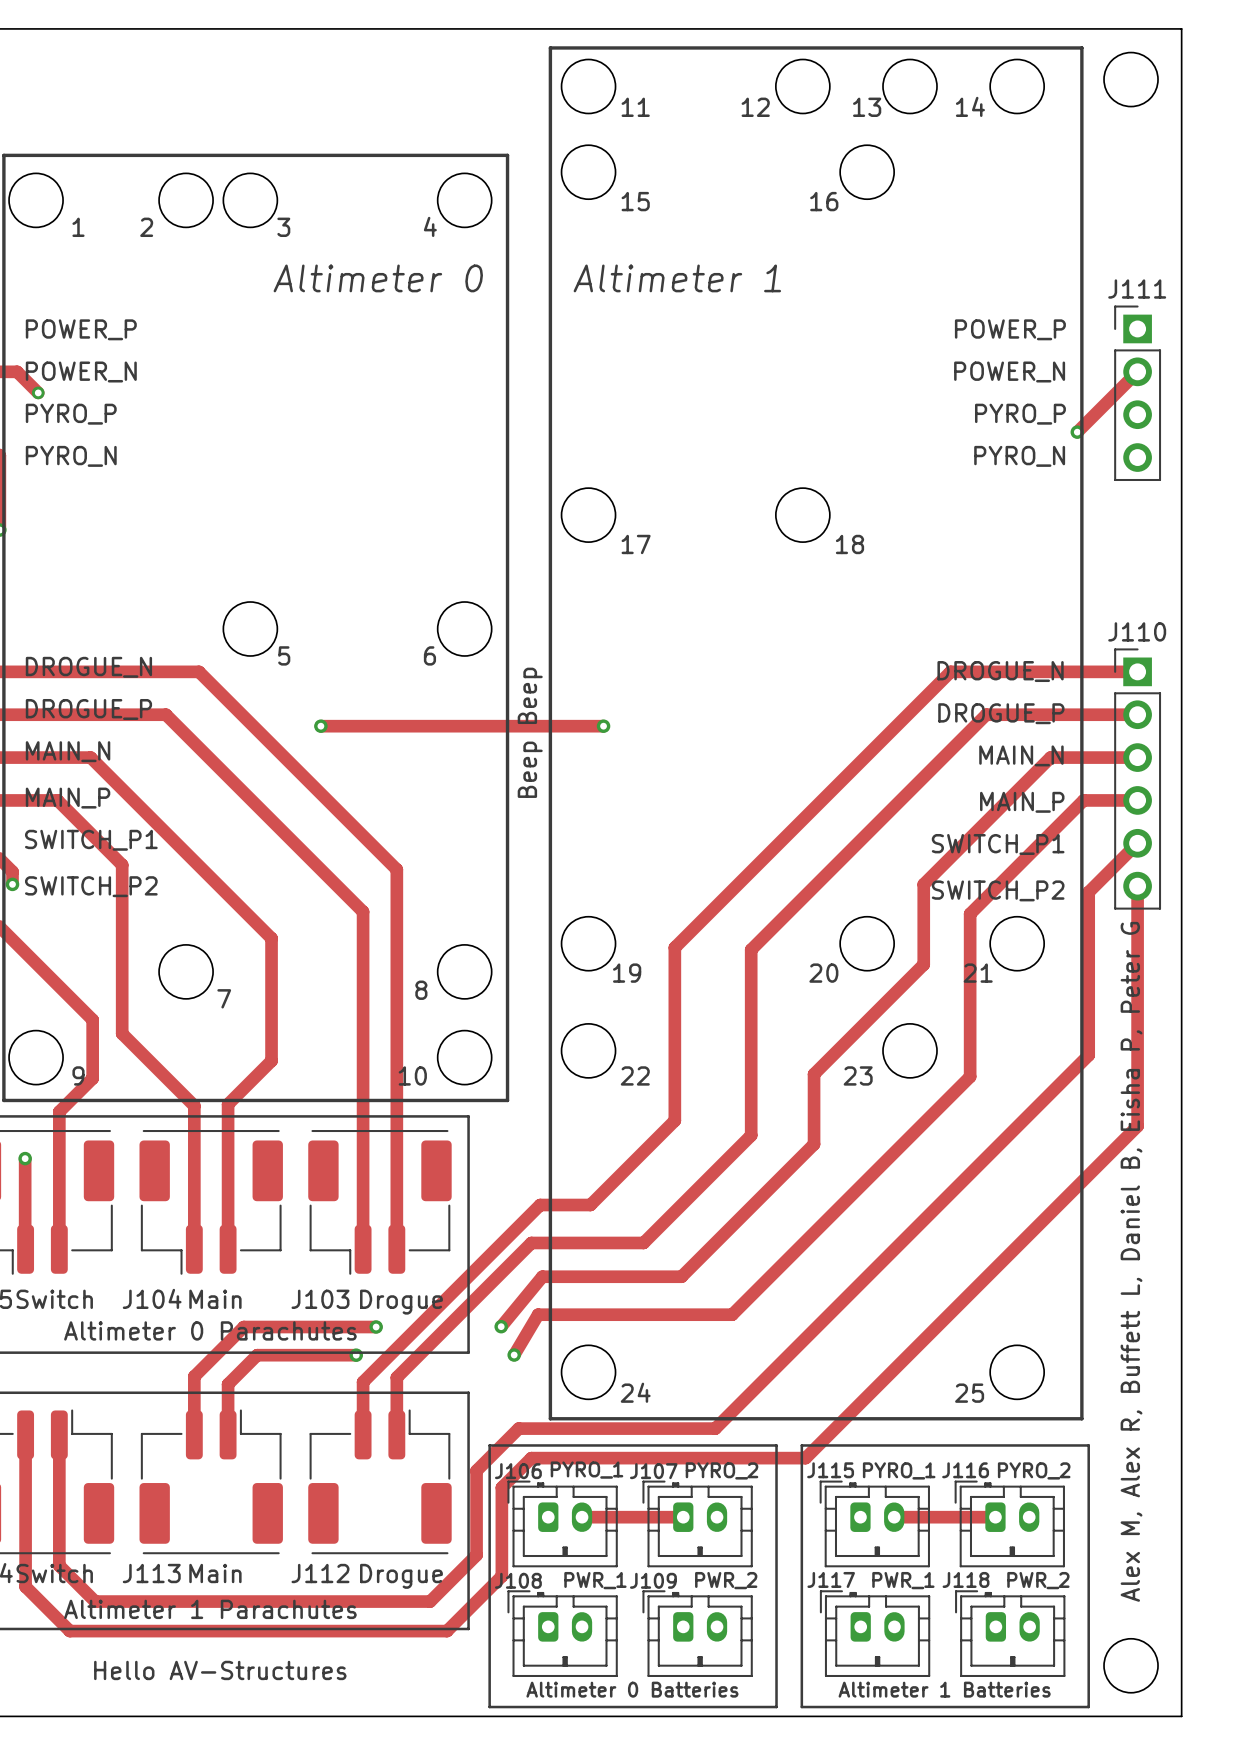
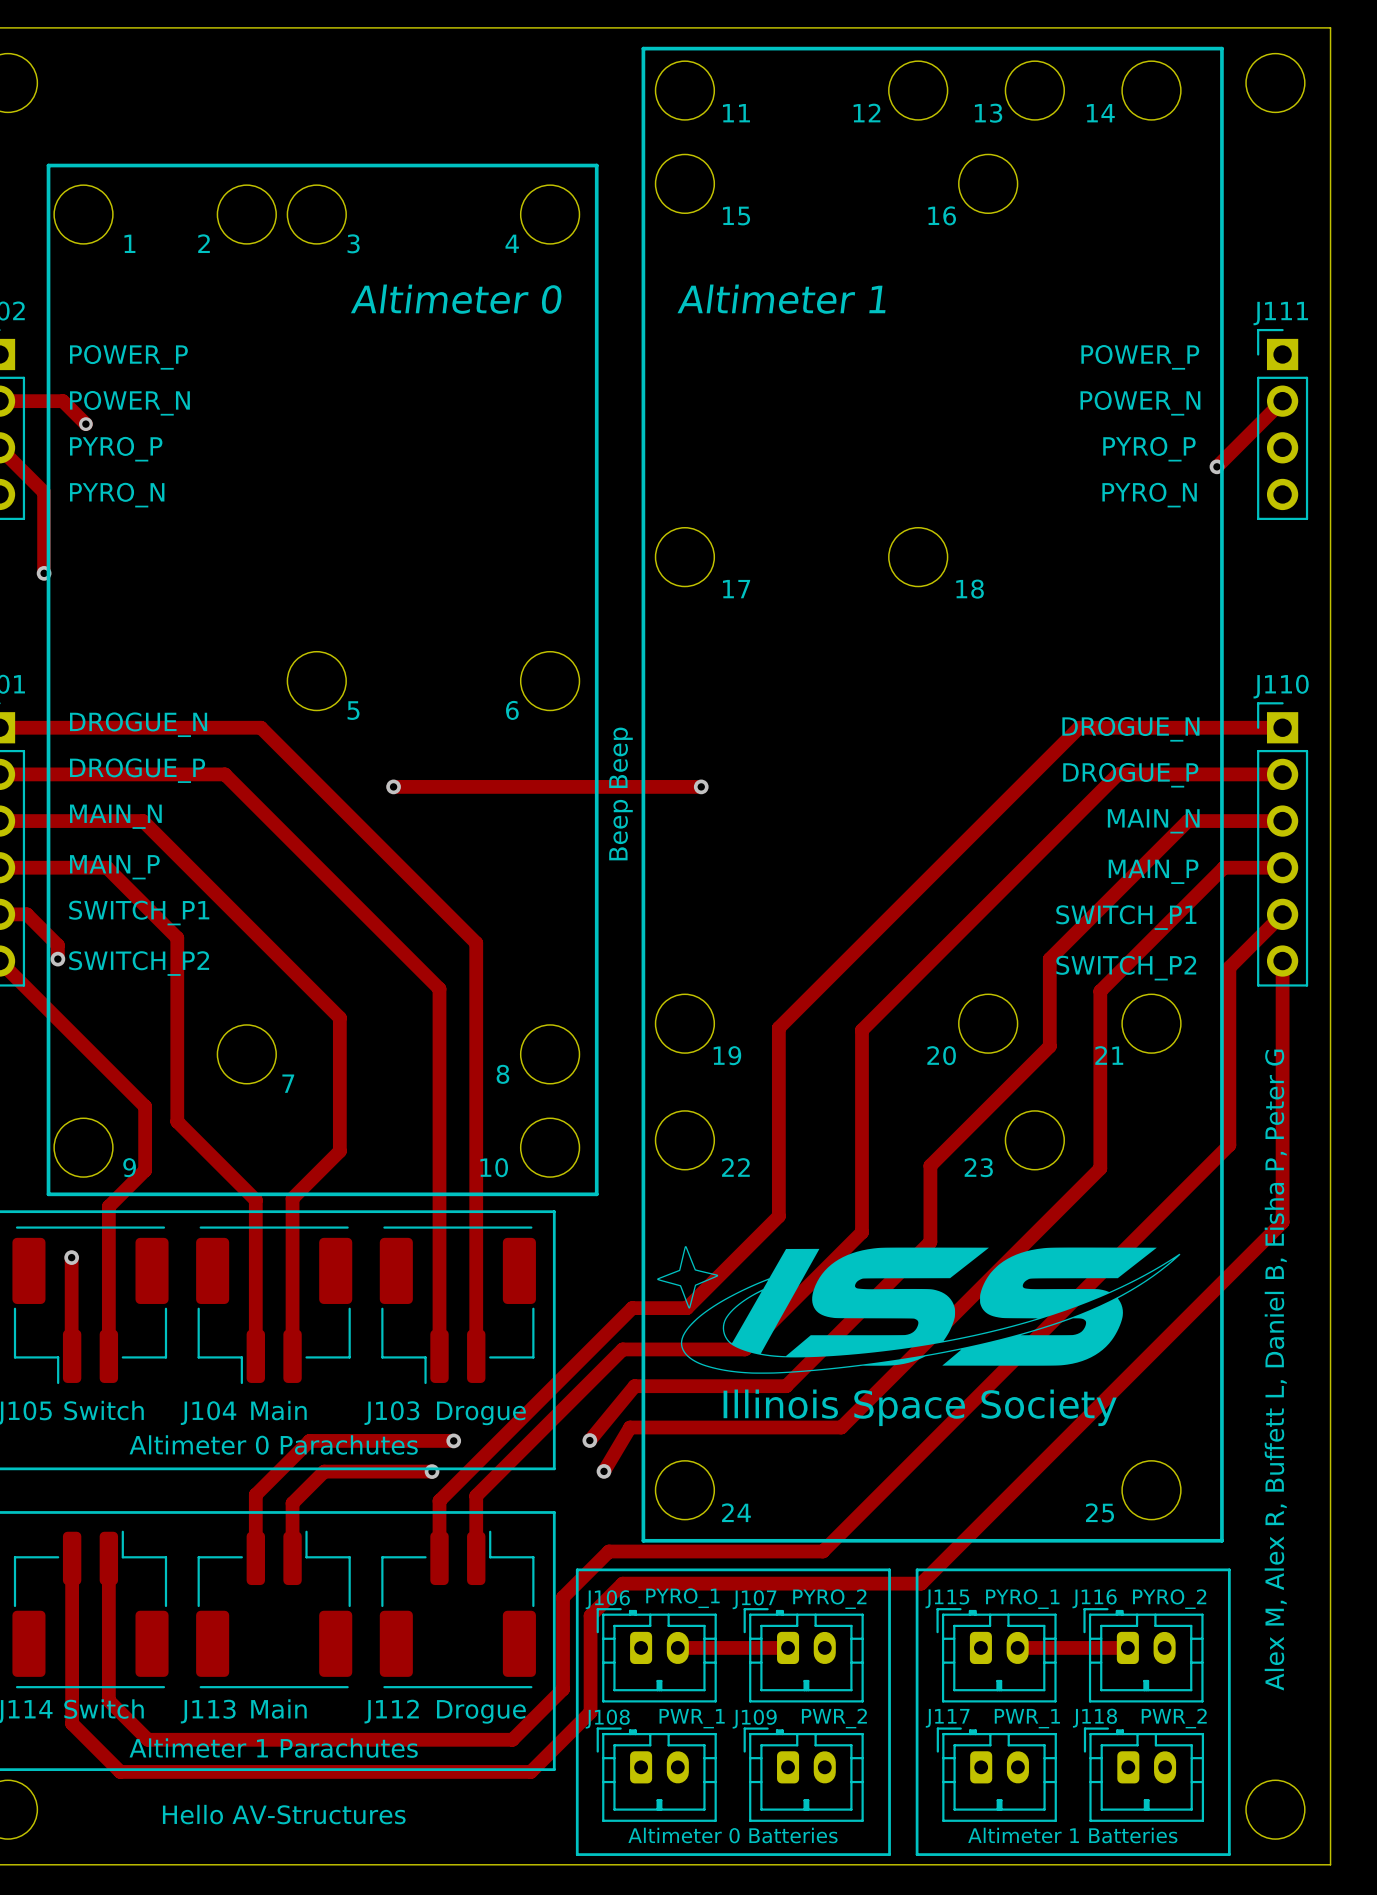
drawing: none -> [657, 1246, 1181, 1374]
text: none -> Illinois Space Society (920, 1407)

